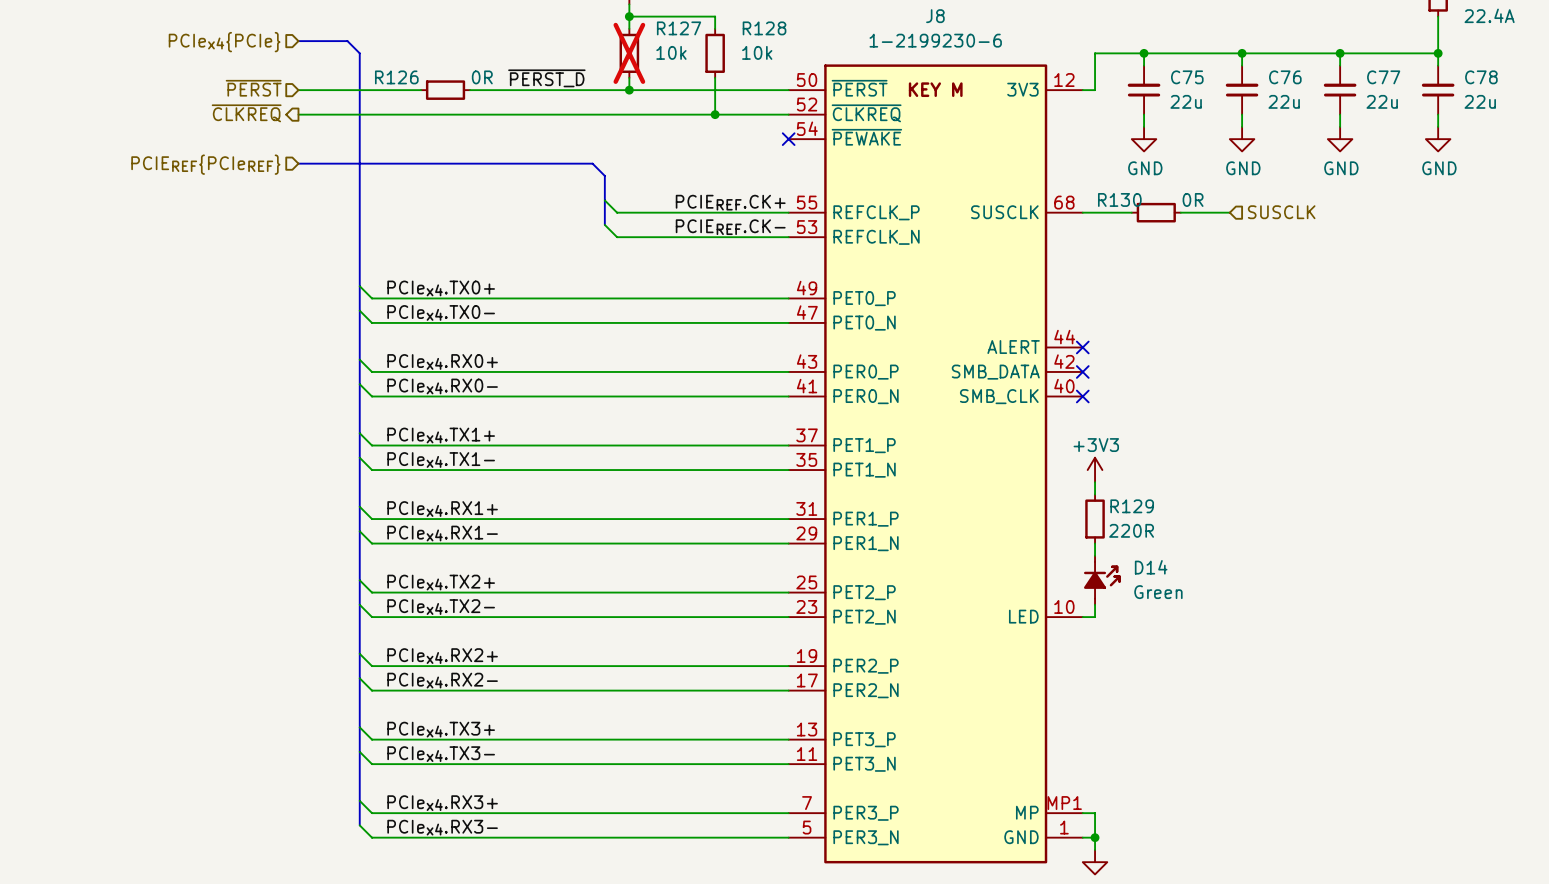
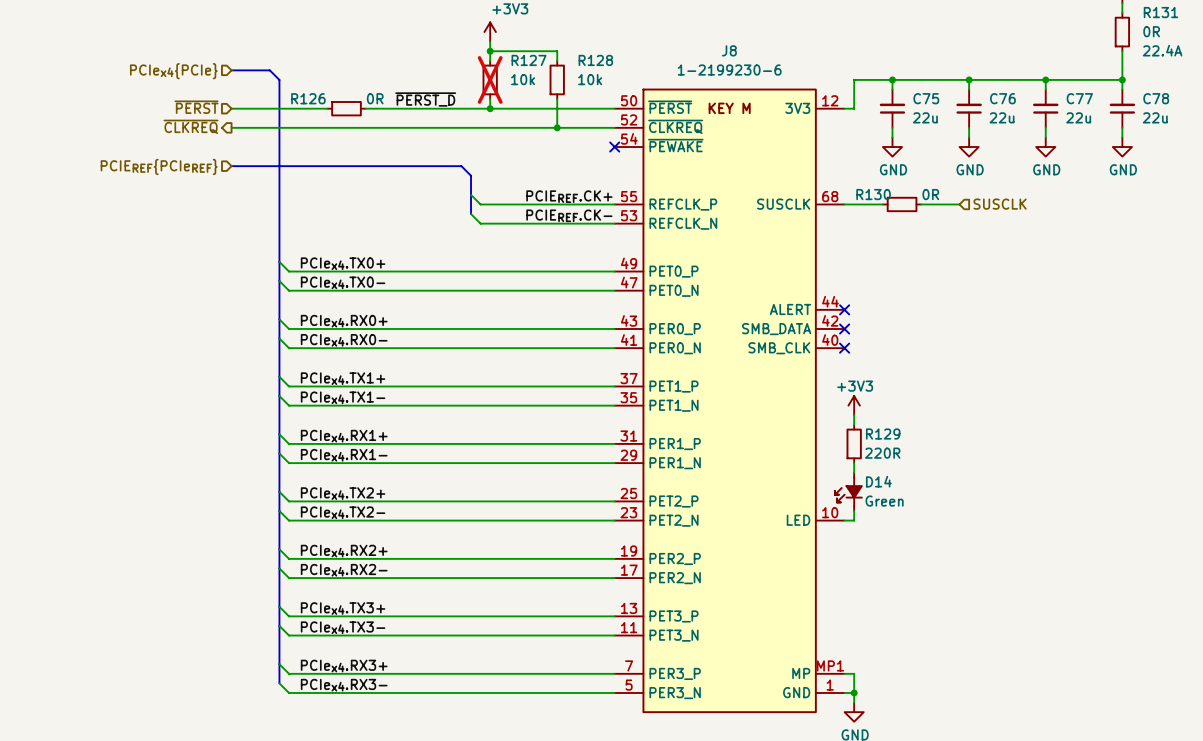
D14 rotation: 0° (1102, 580) -> 180° (848, 491)

